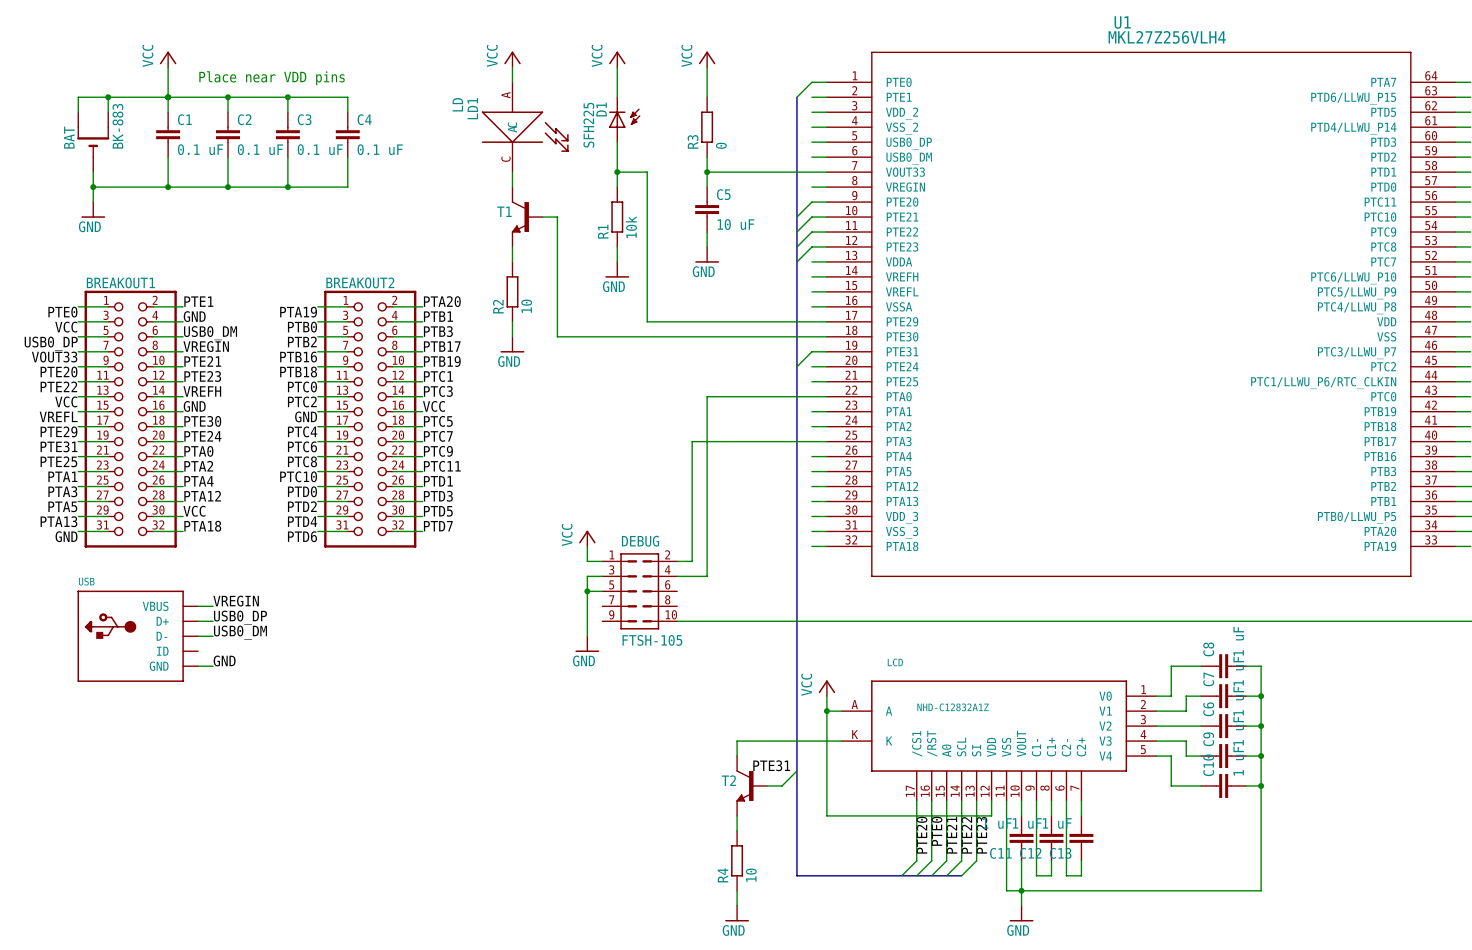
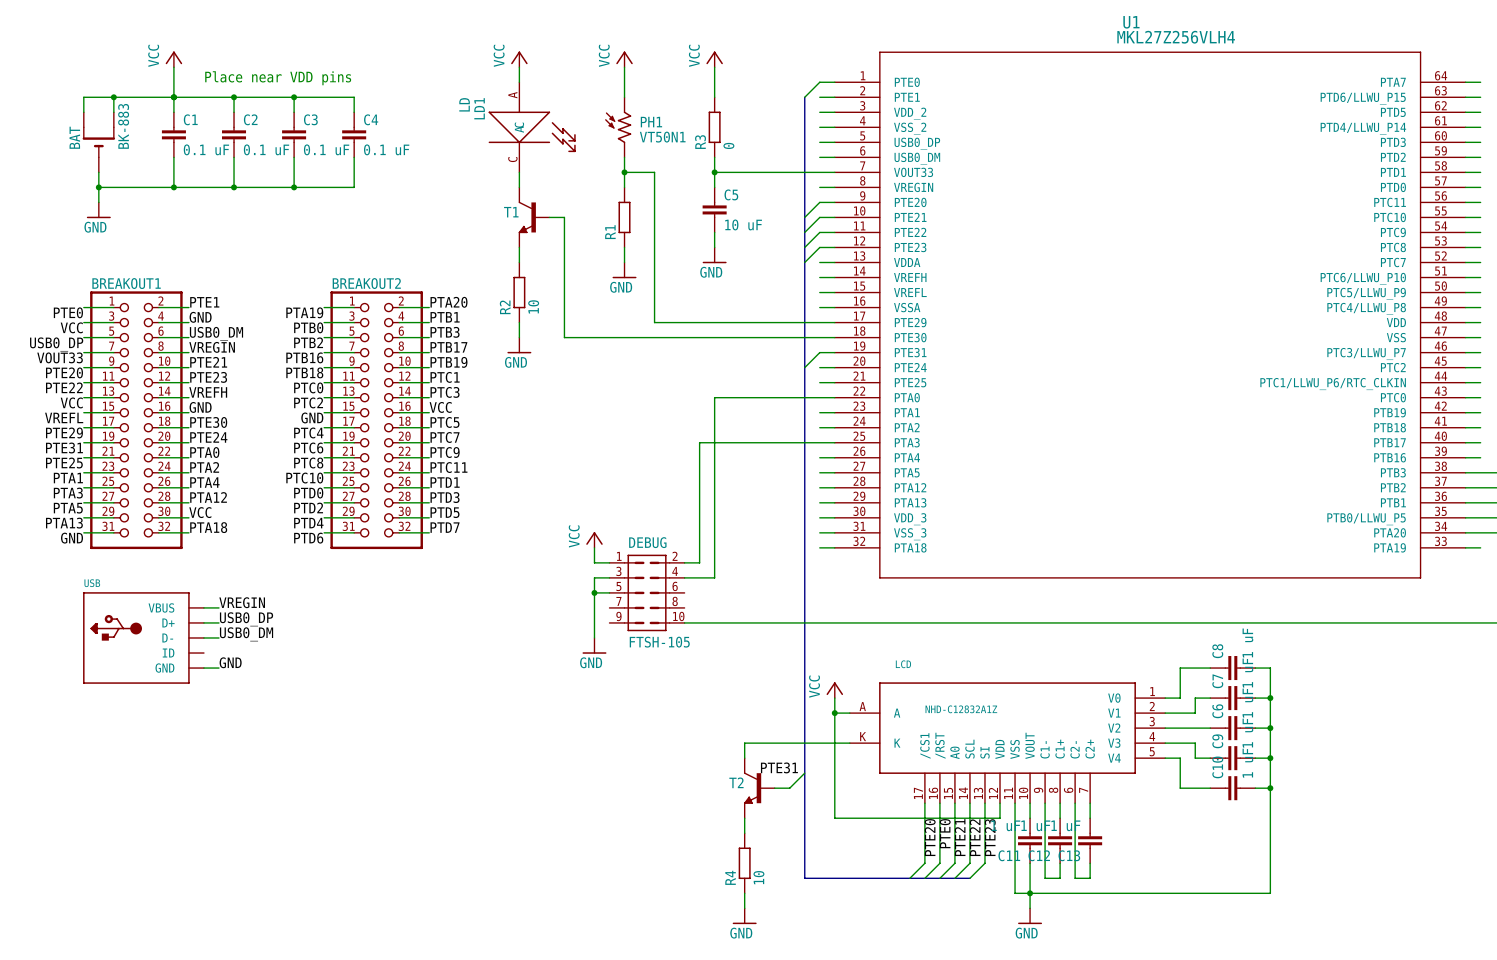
D1: SFH225 (624, 119) -> none
PH1: none -> VT50N1 (618, 127)
R1 value: 10k (631, 227) -> none

